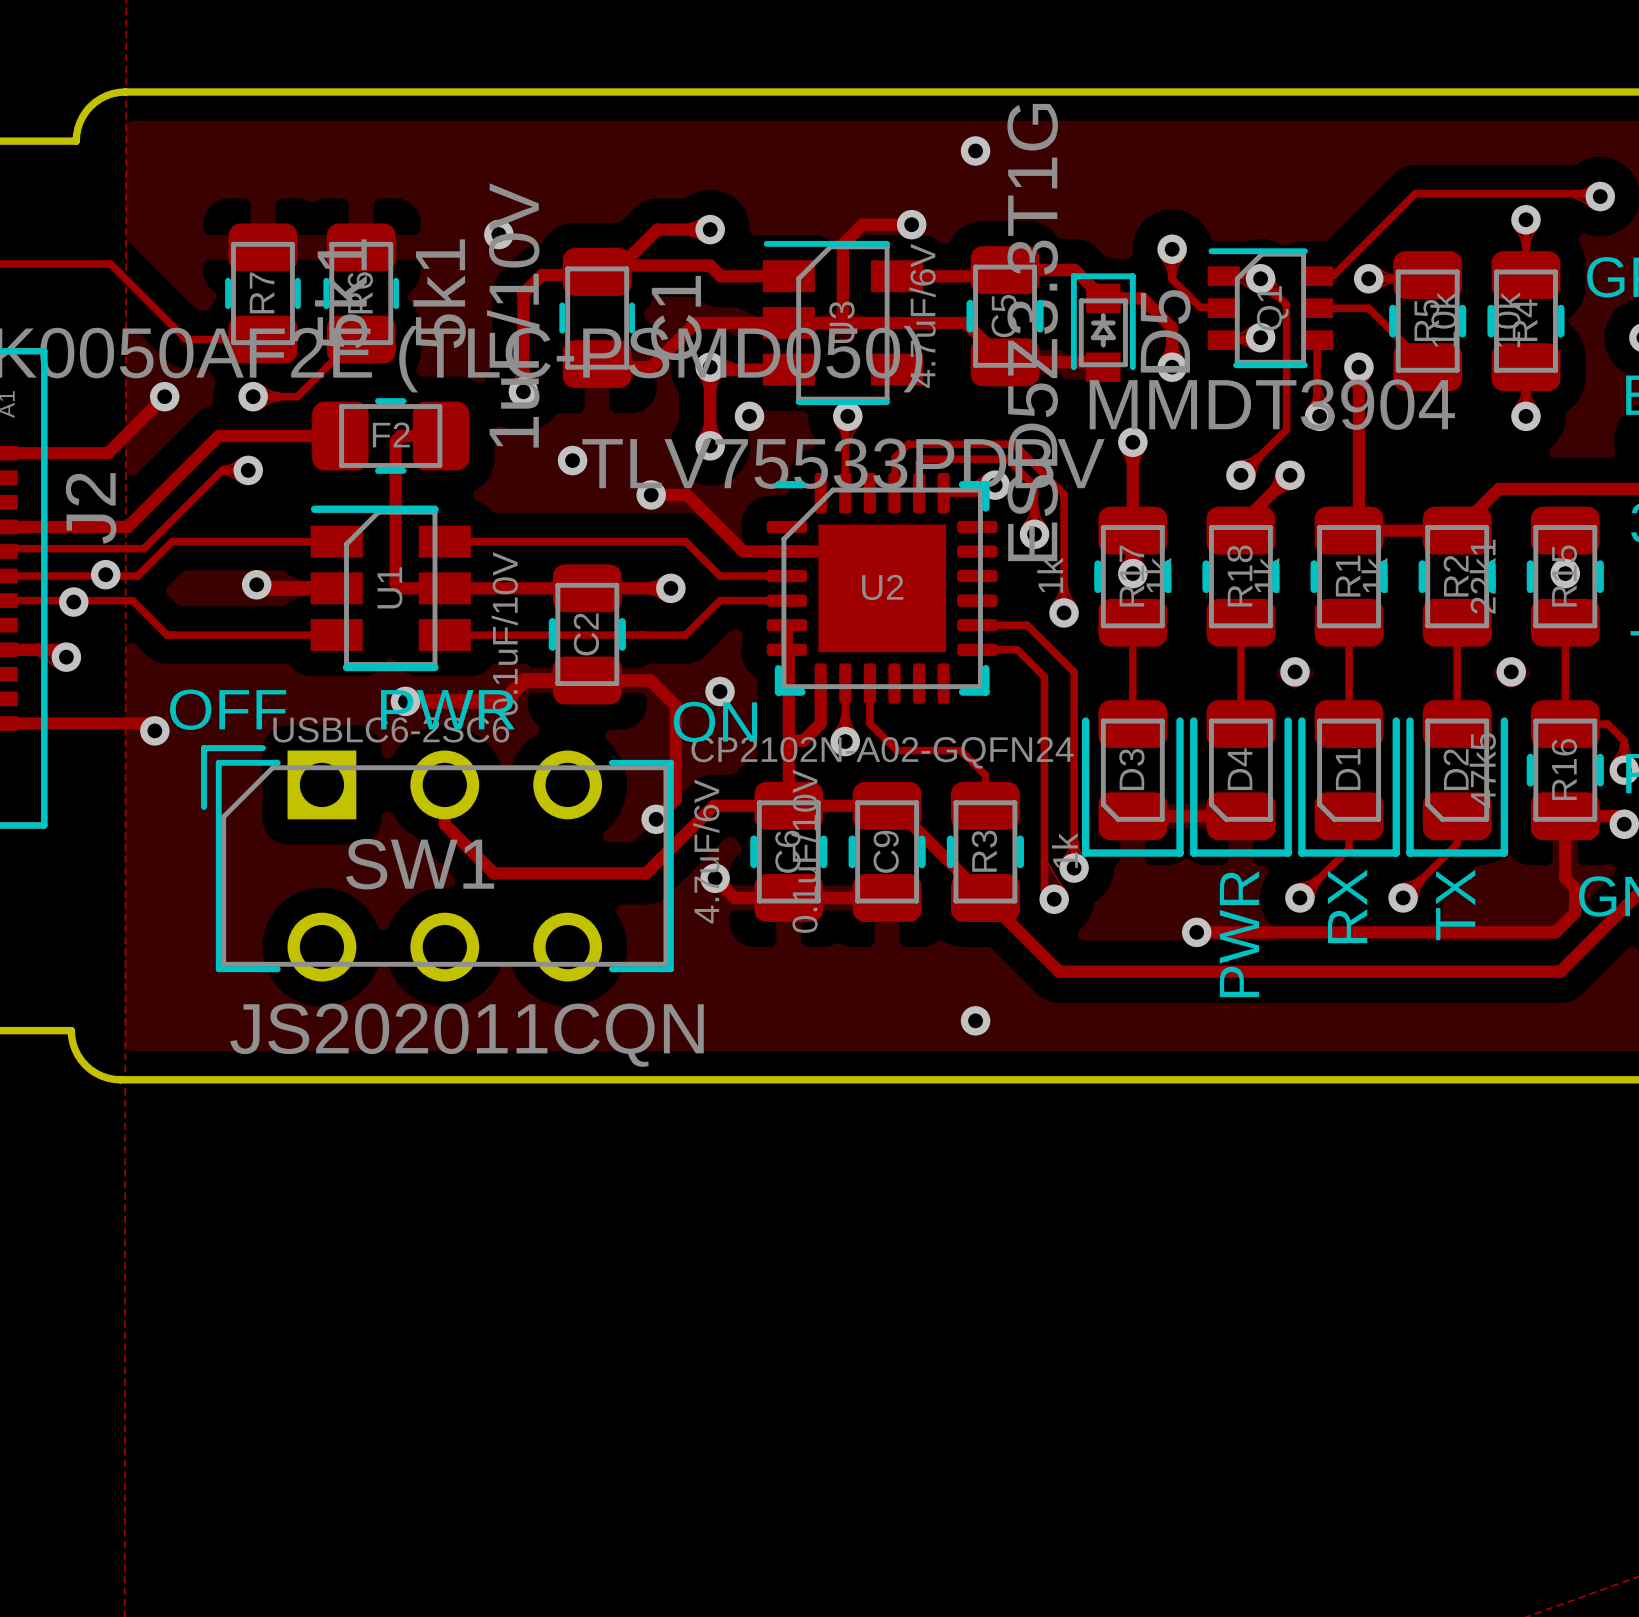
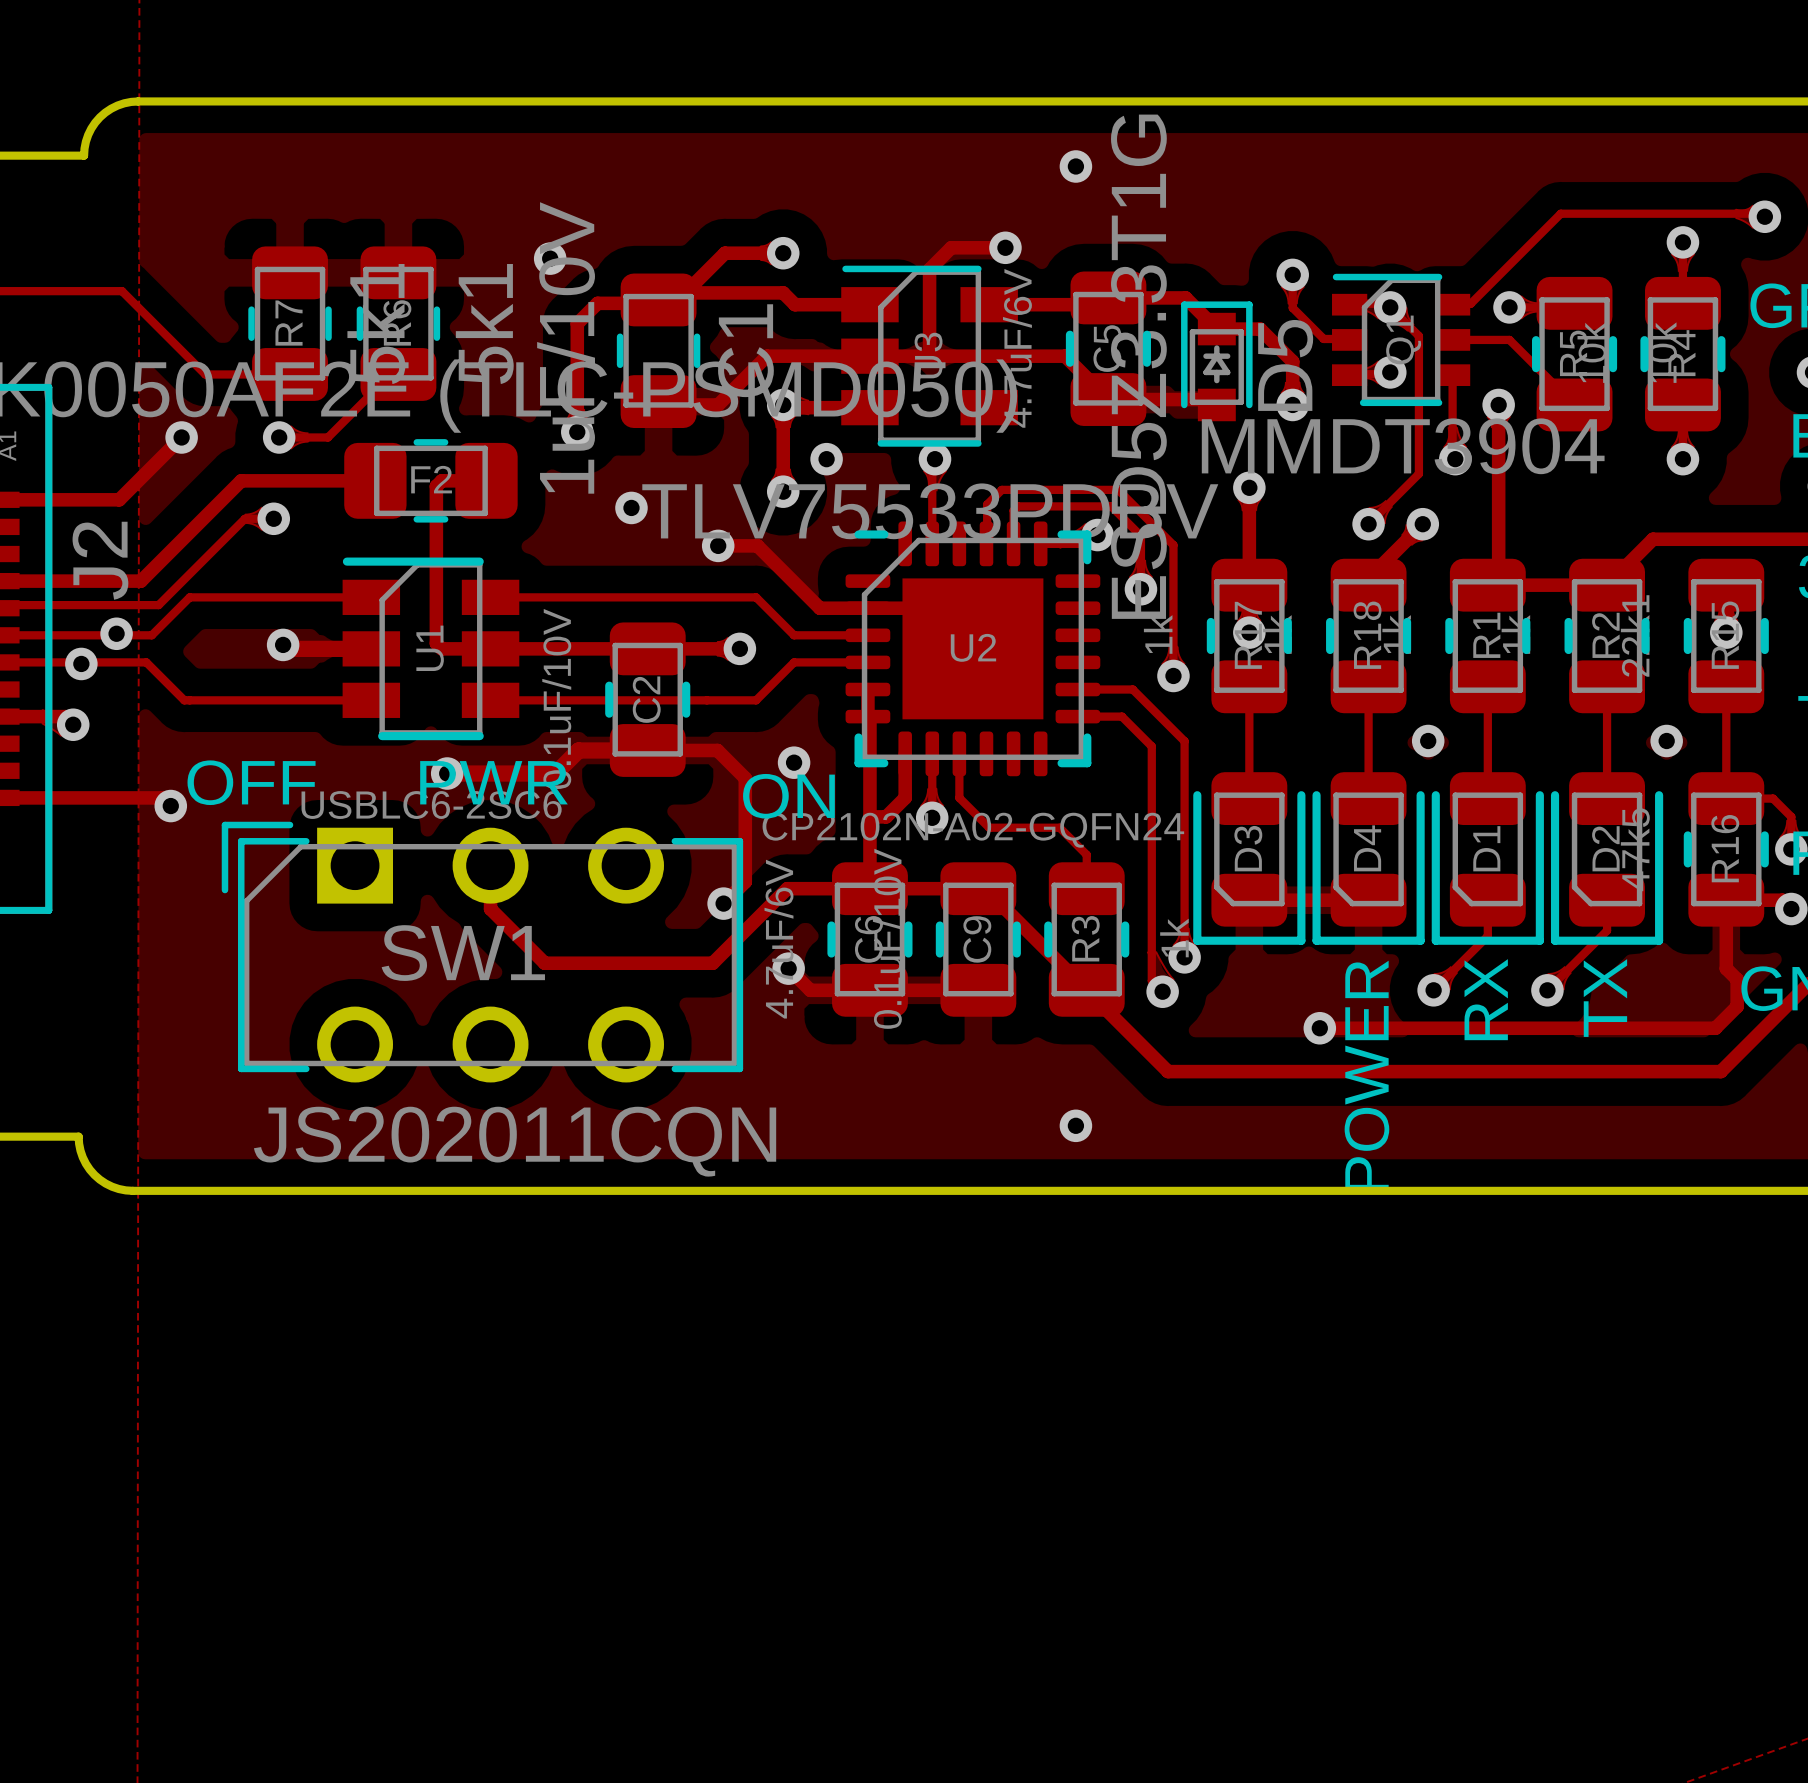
D4 value: PWR (1239, 934) -> POWER (1366, 1075)

